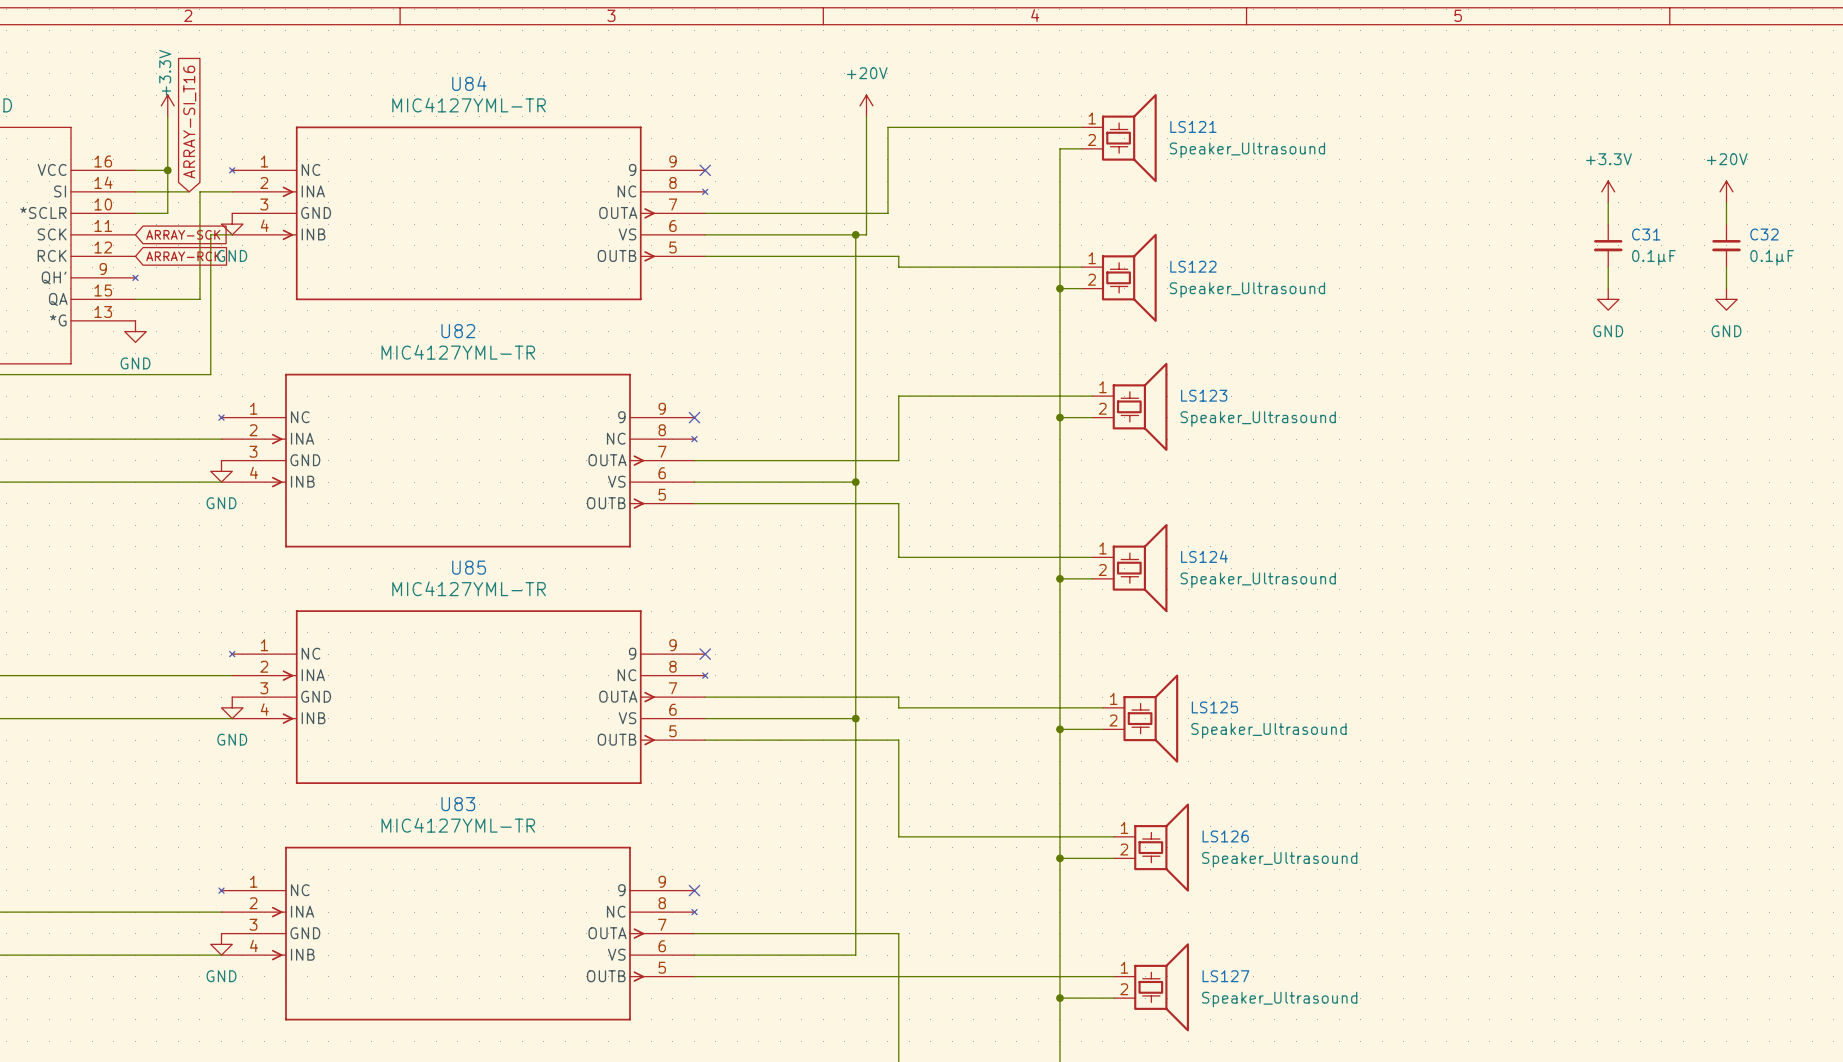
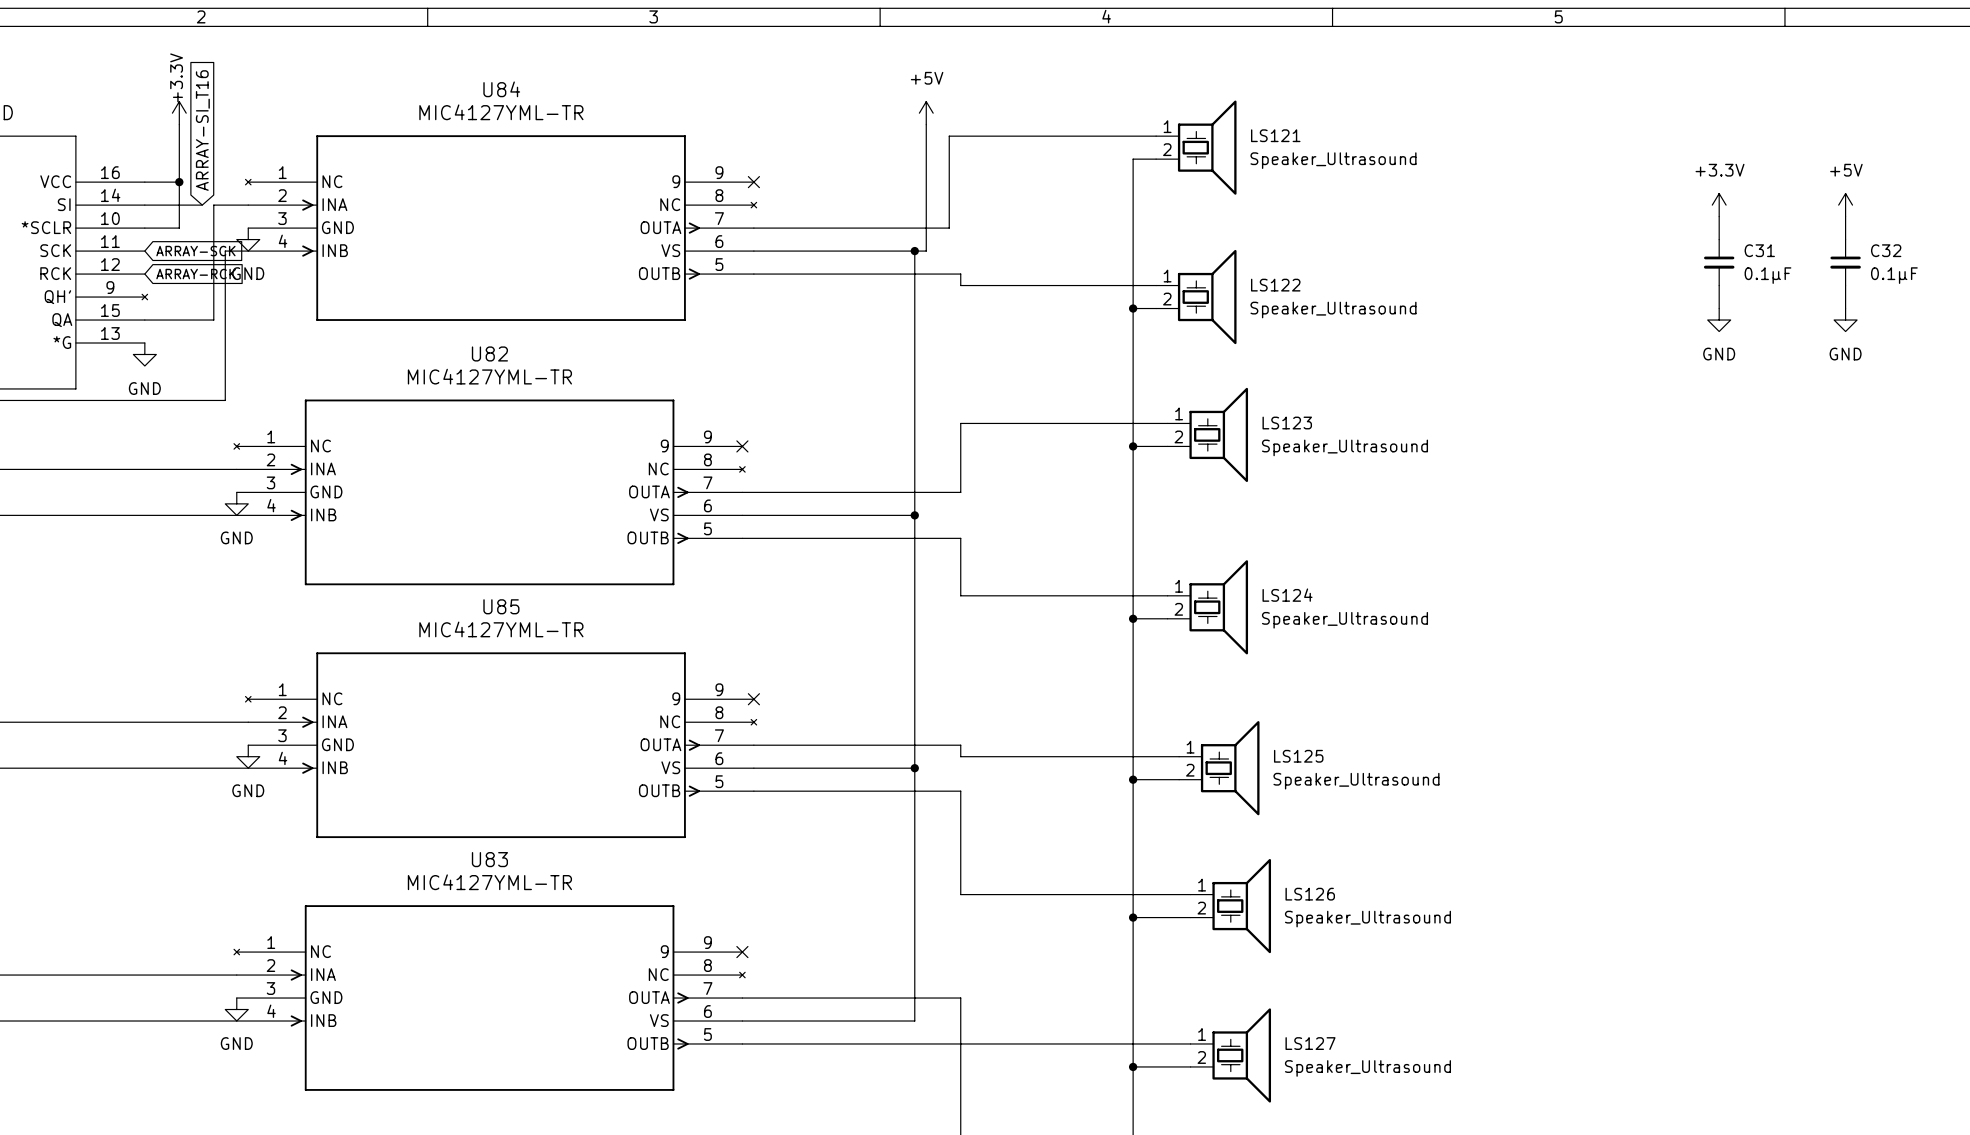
power symbol: +20V (866, 105) -> +5V (926, 113)
power symbol: +20V (1726, 191) -> +5V (1845, 205)

